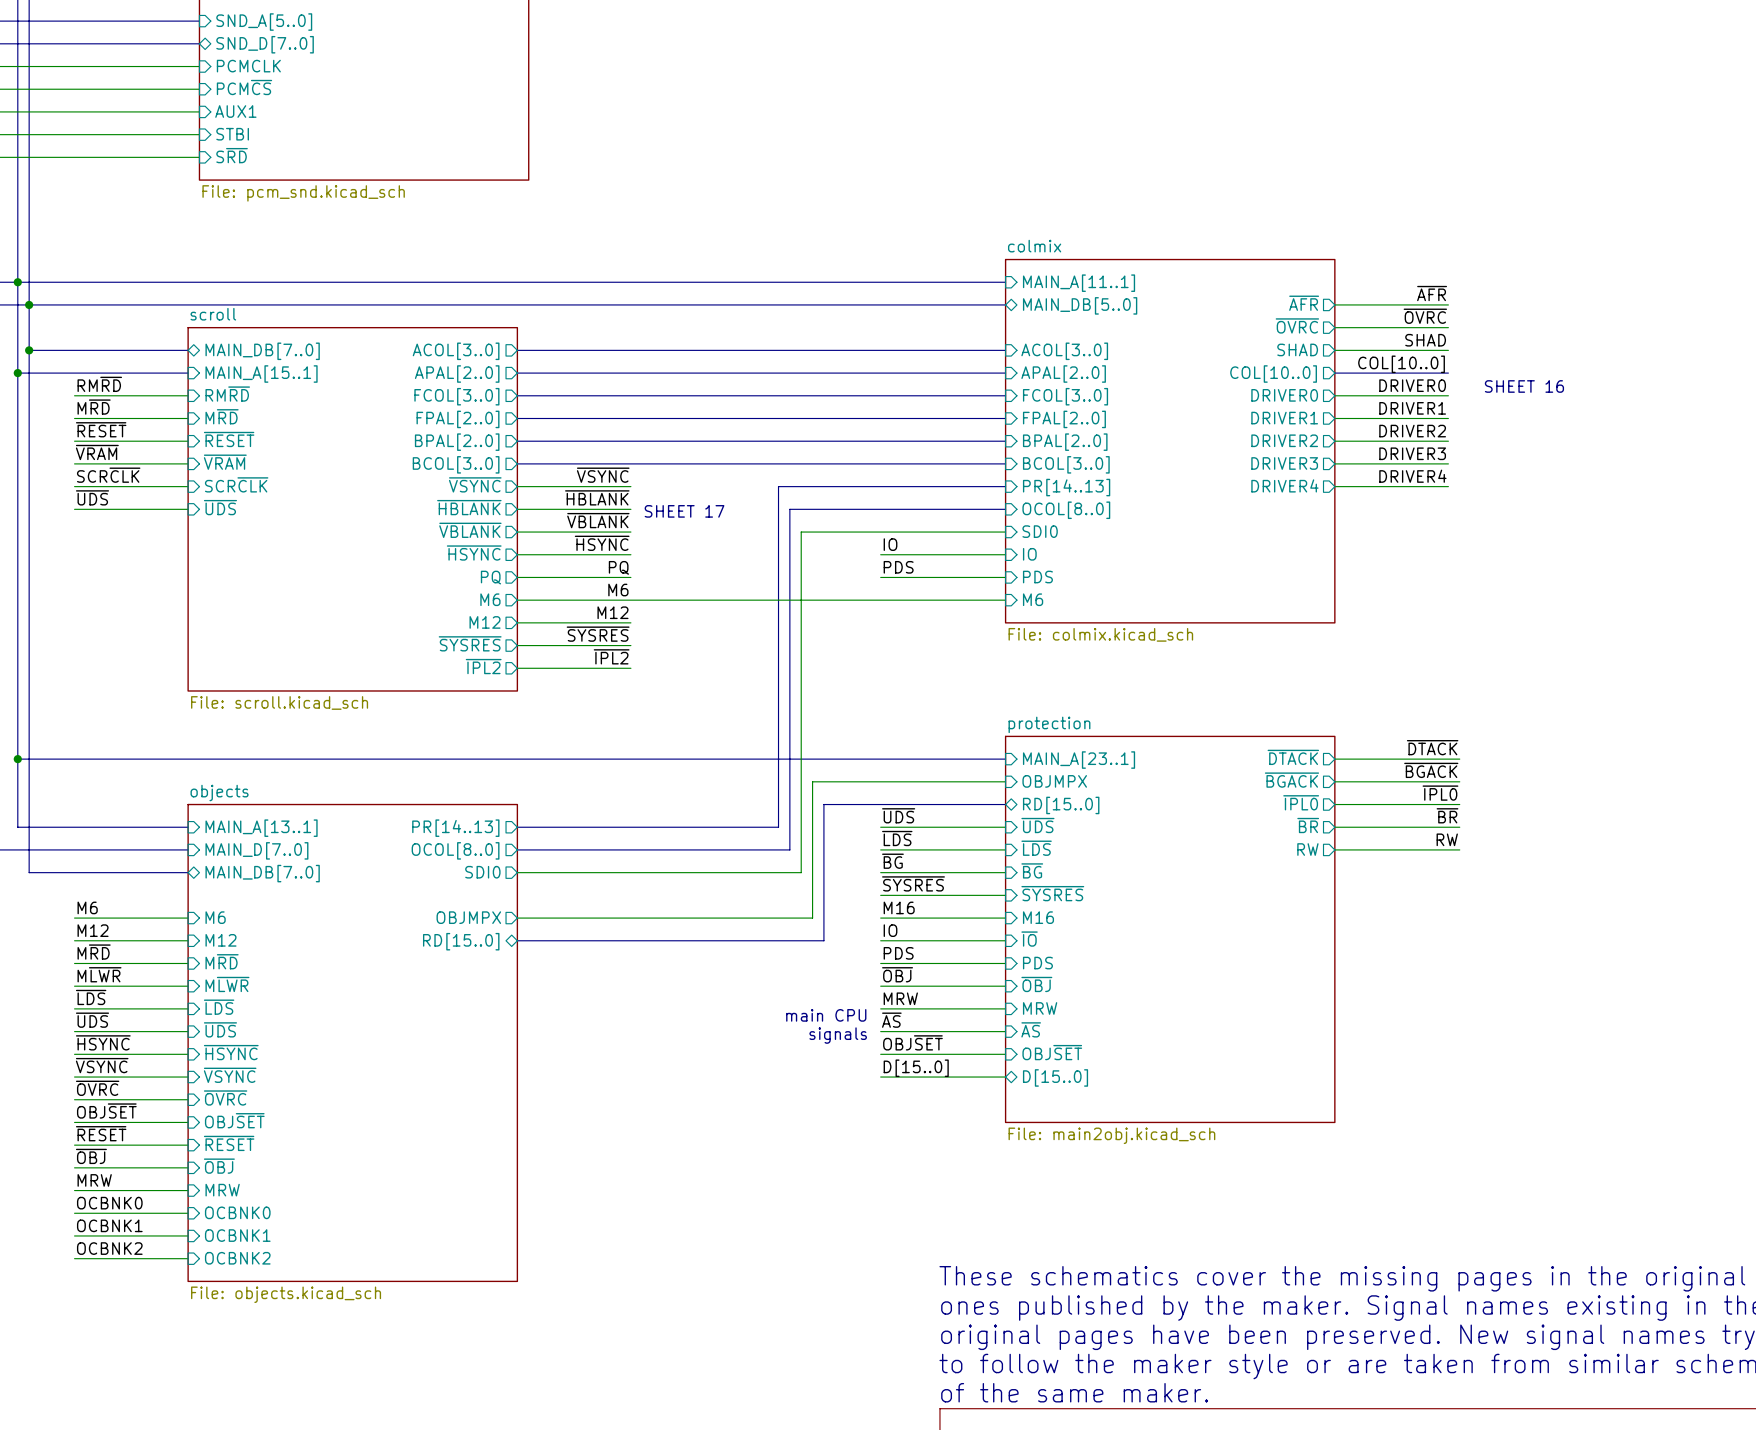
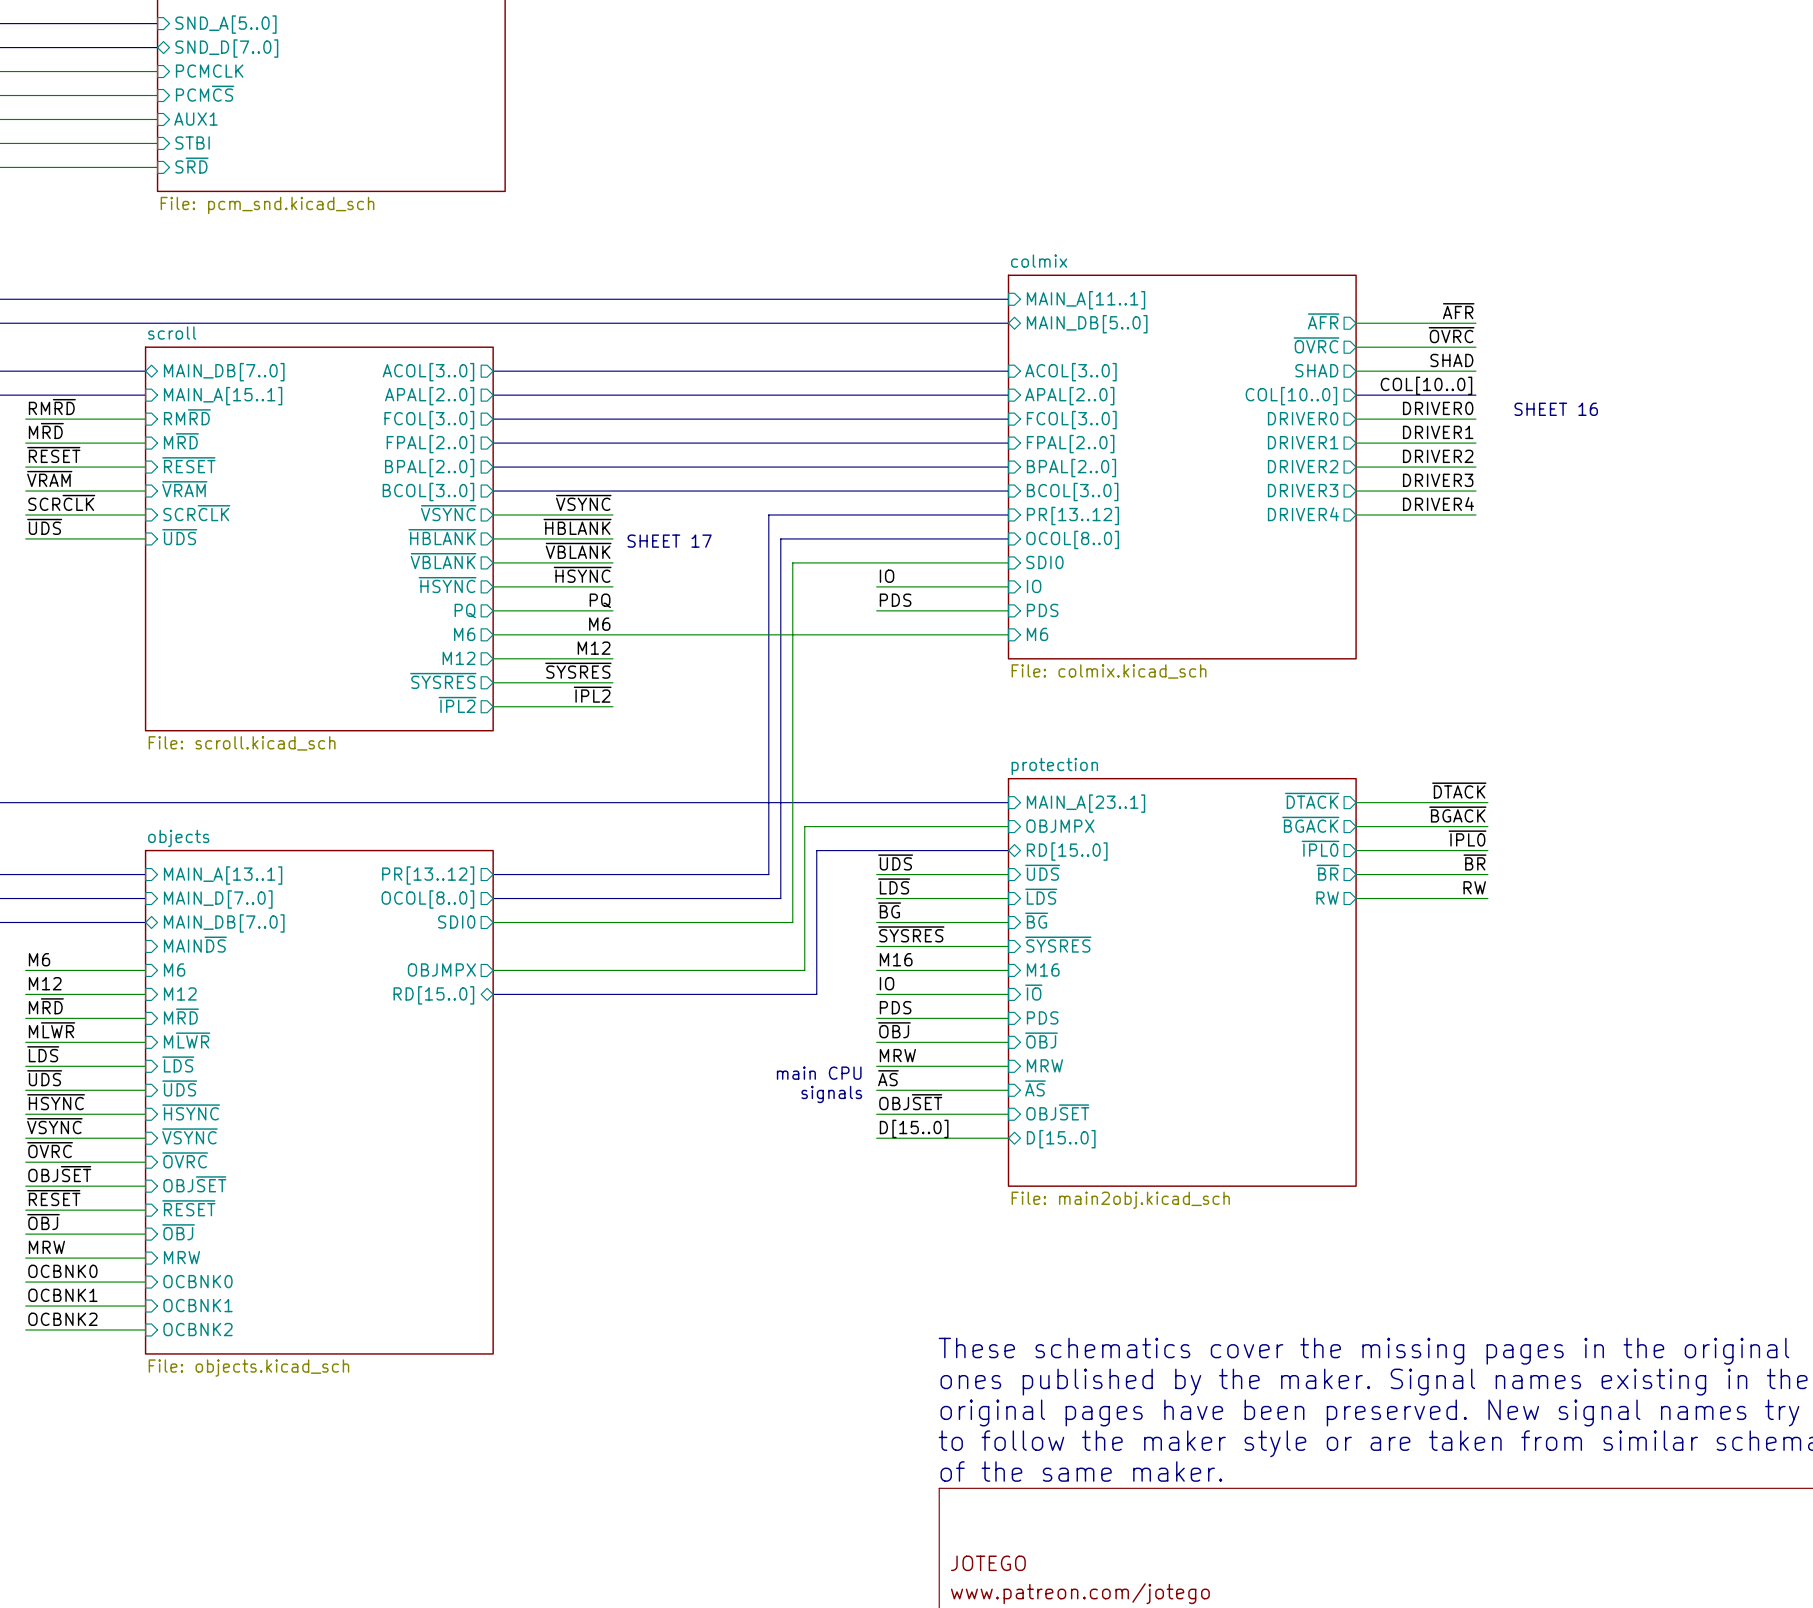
sheet pin: PR[14..13] (1066, 487) -> PR[13..12] (1072, 515)
sheet pin: PR[14..13] (455, 828) -> PR[13..12] (428, 875)
sheet pin: none -> MAIN~{DS} (195, 944)

